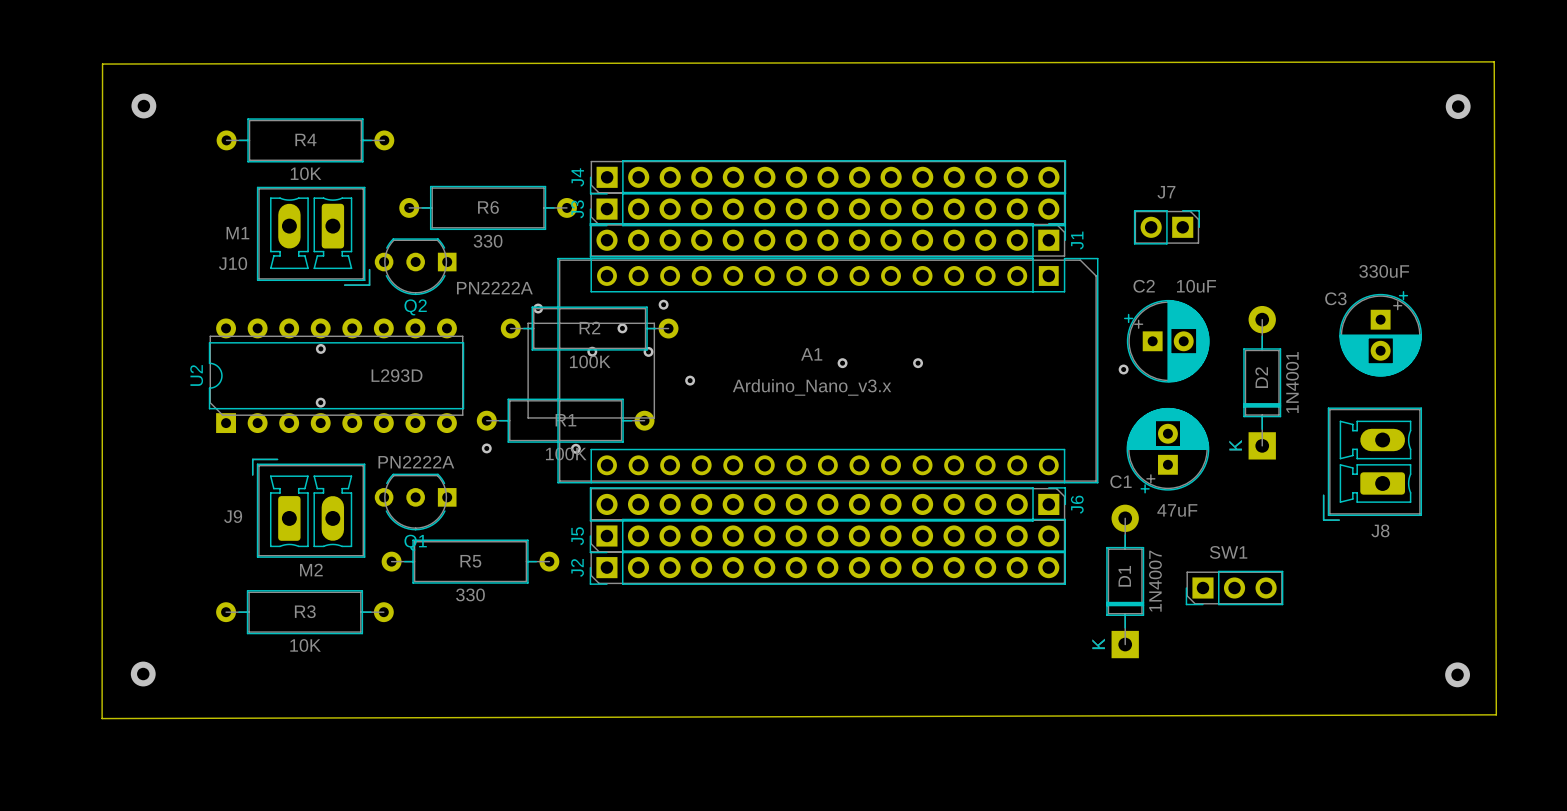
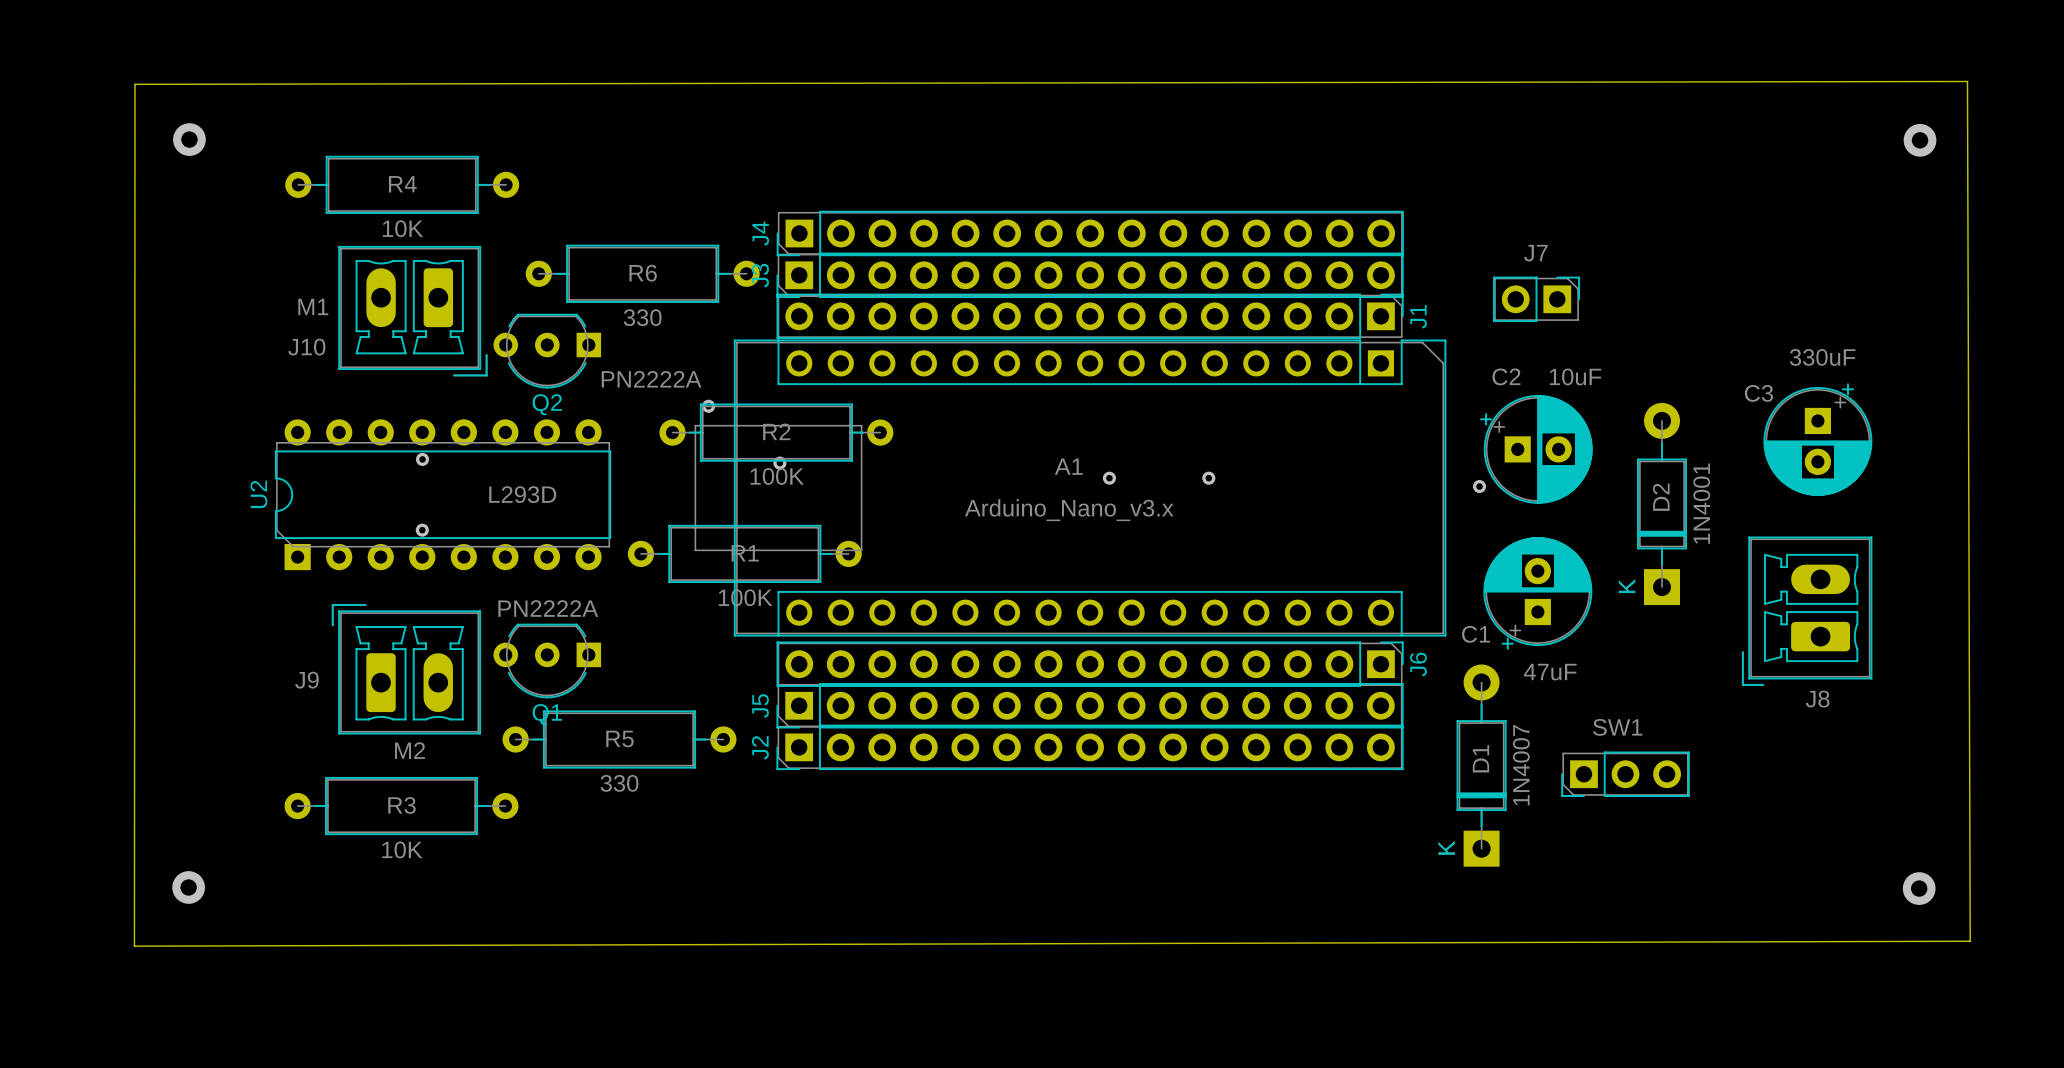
via: (663, 304) -> none
via: (622, 328) -> none
via: (648, 351) -> none
via: (690, 380) -> none
via: (486, 448) -> none
via: (575, 448) -> none

